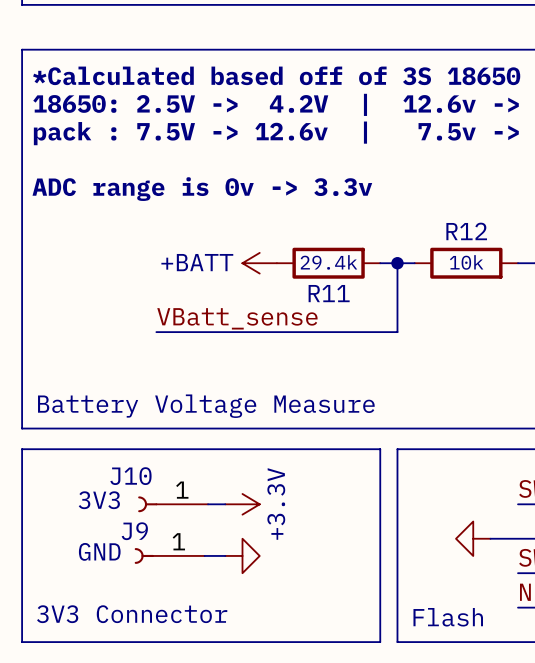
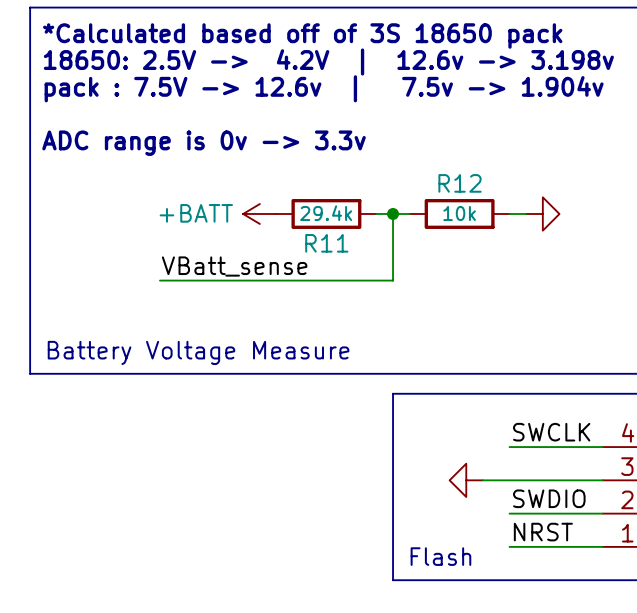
line: (22, 449) (380, 449) (380, 642) (22, 642) (22, 449) -> none
J10: 3V3 (173, 504) -> none
wire: (208, 504) (225, 504) -> none
power symbol: +3.3V (242, 504) -> none
J9: GND (169, 555) -> none
wire: (204, 555) (225, 555) -> none
power symbol: (242, 555) -> none
text: 3V3 Connector (132, 614) -> none

